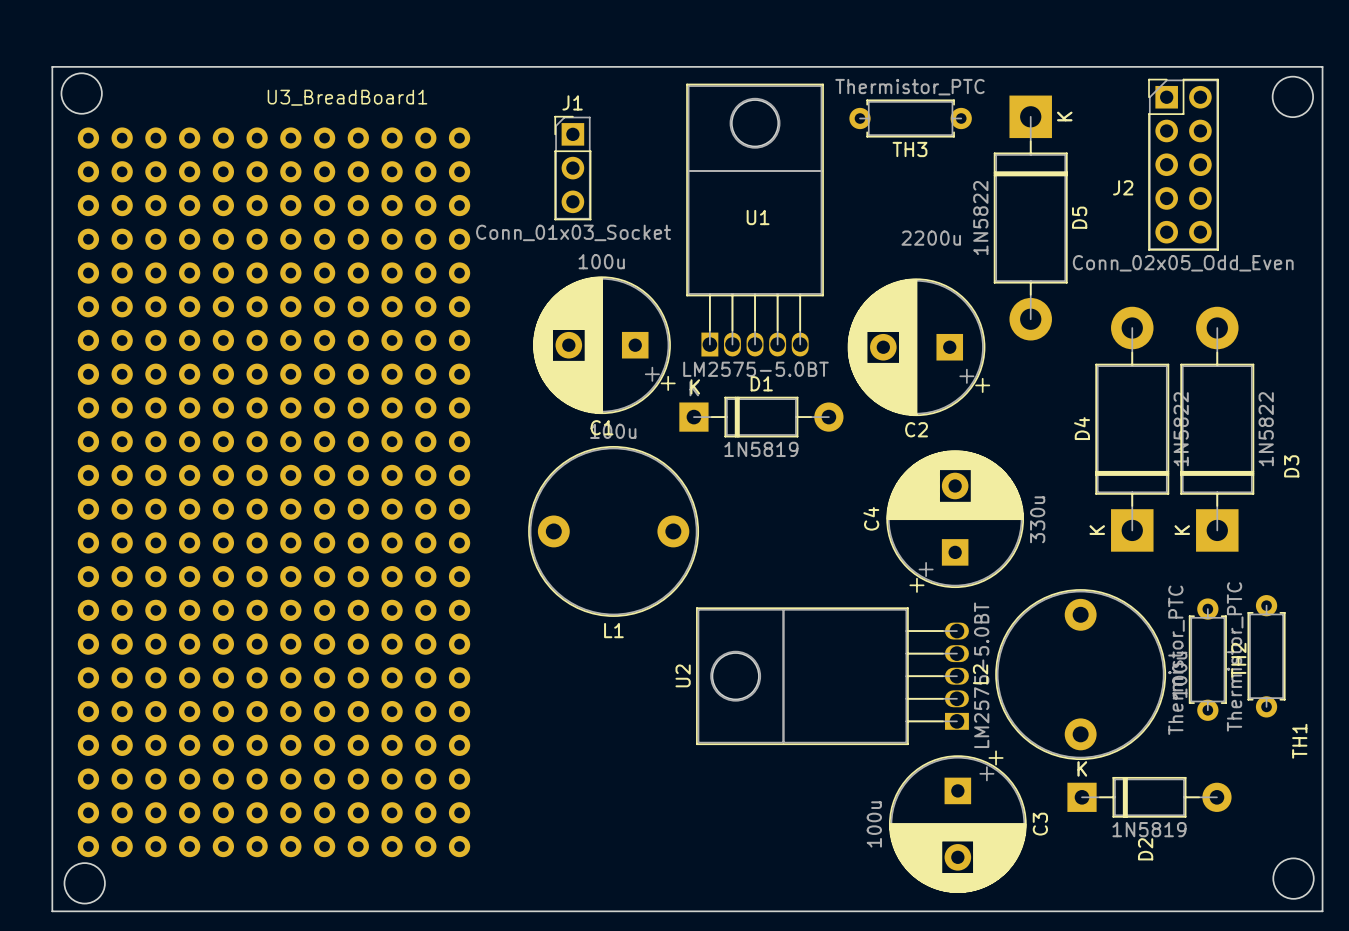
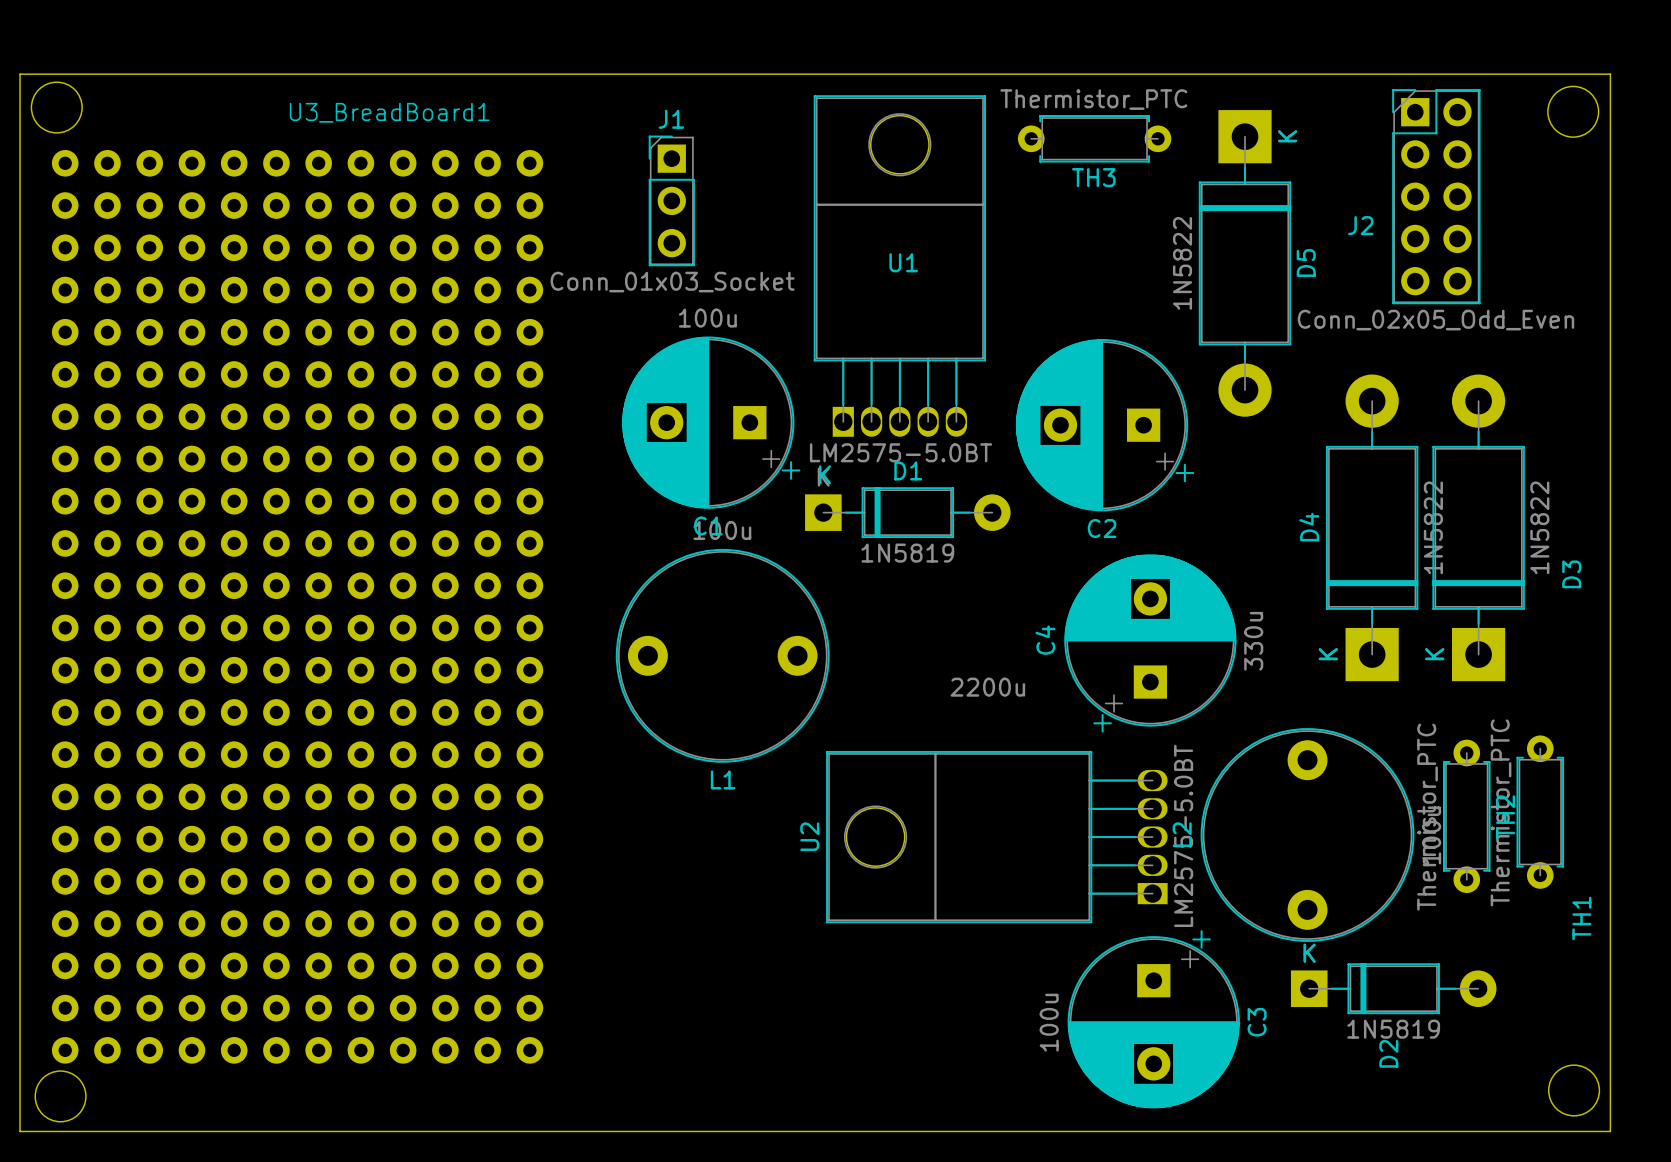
C2 value position: 2200u (931, 238) -> 2200u (987, 687)

